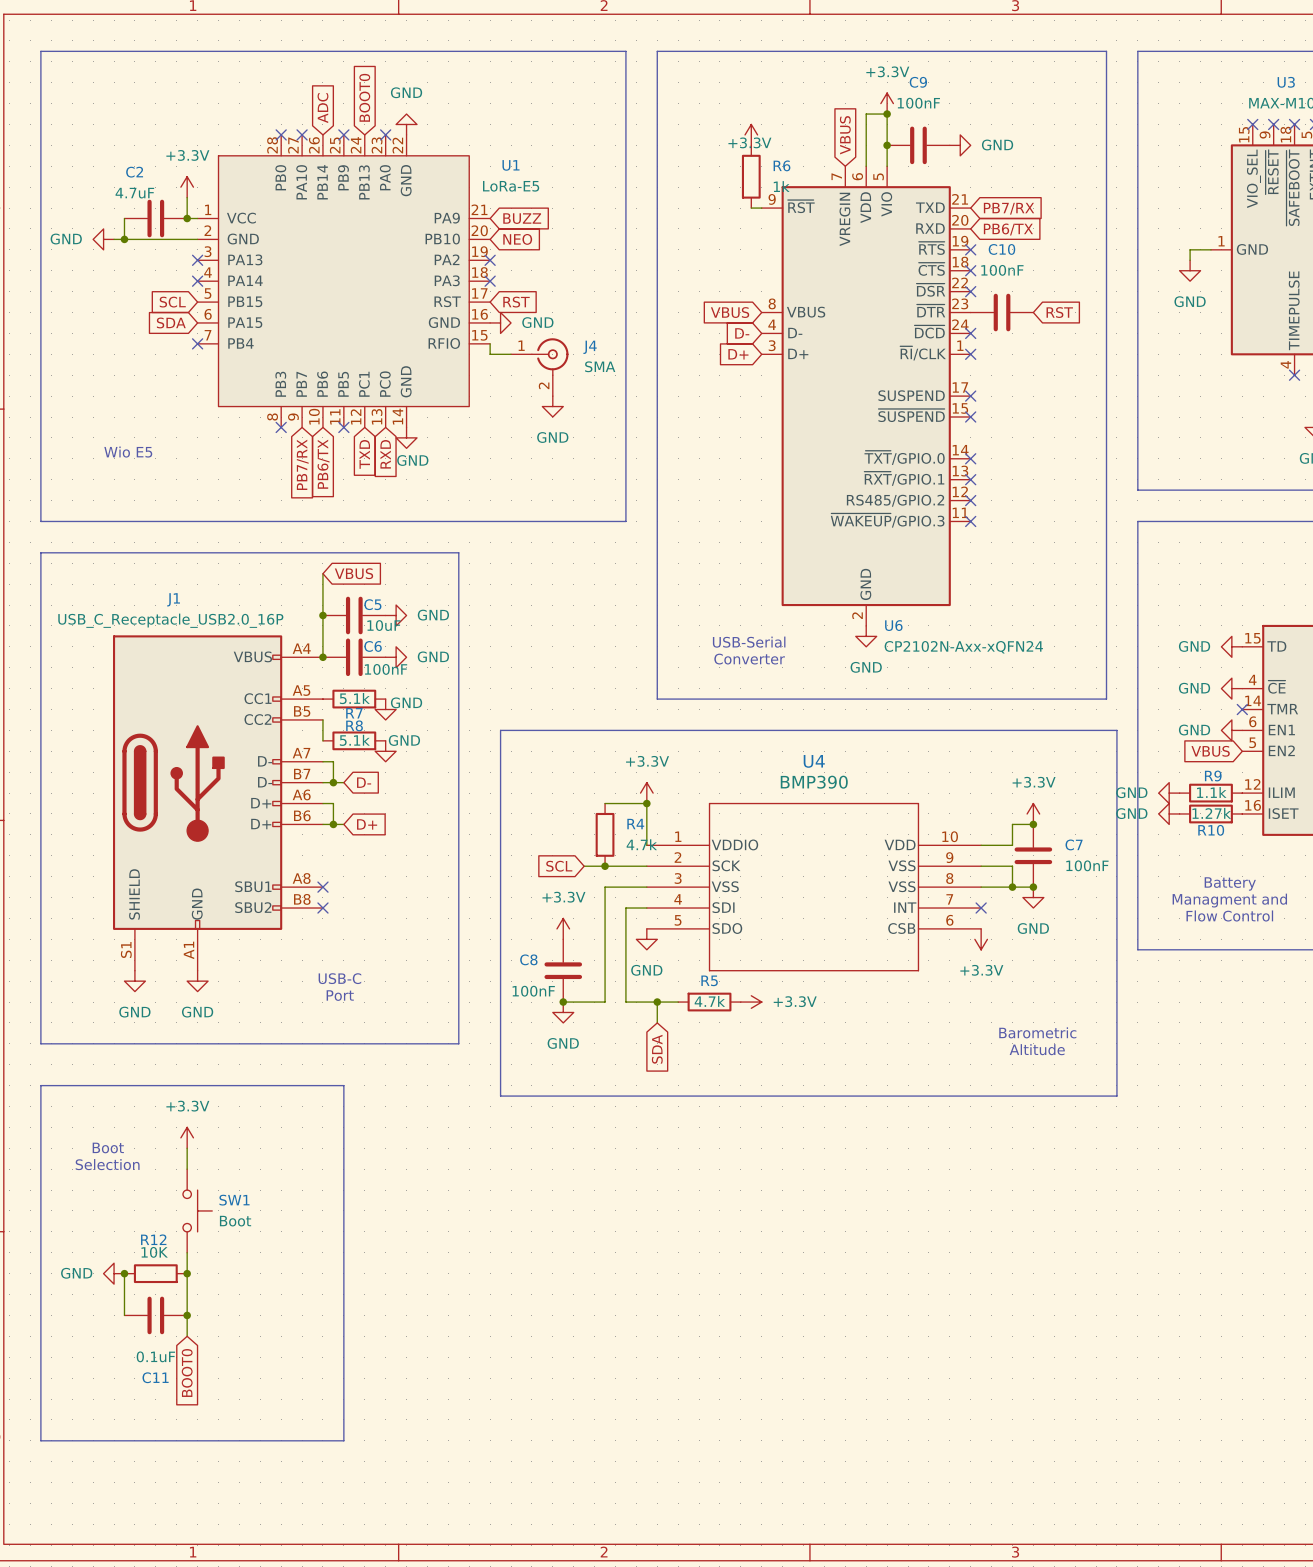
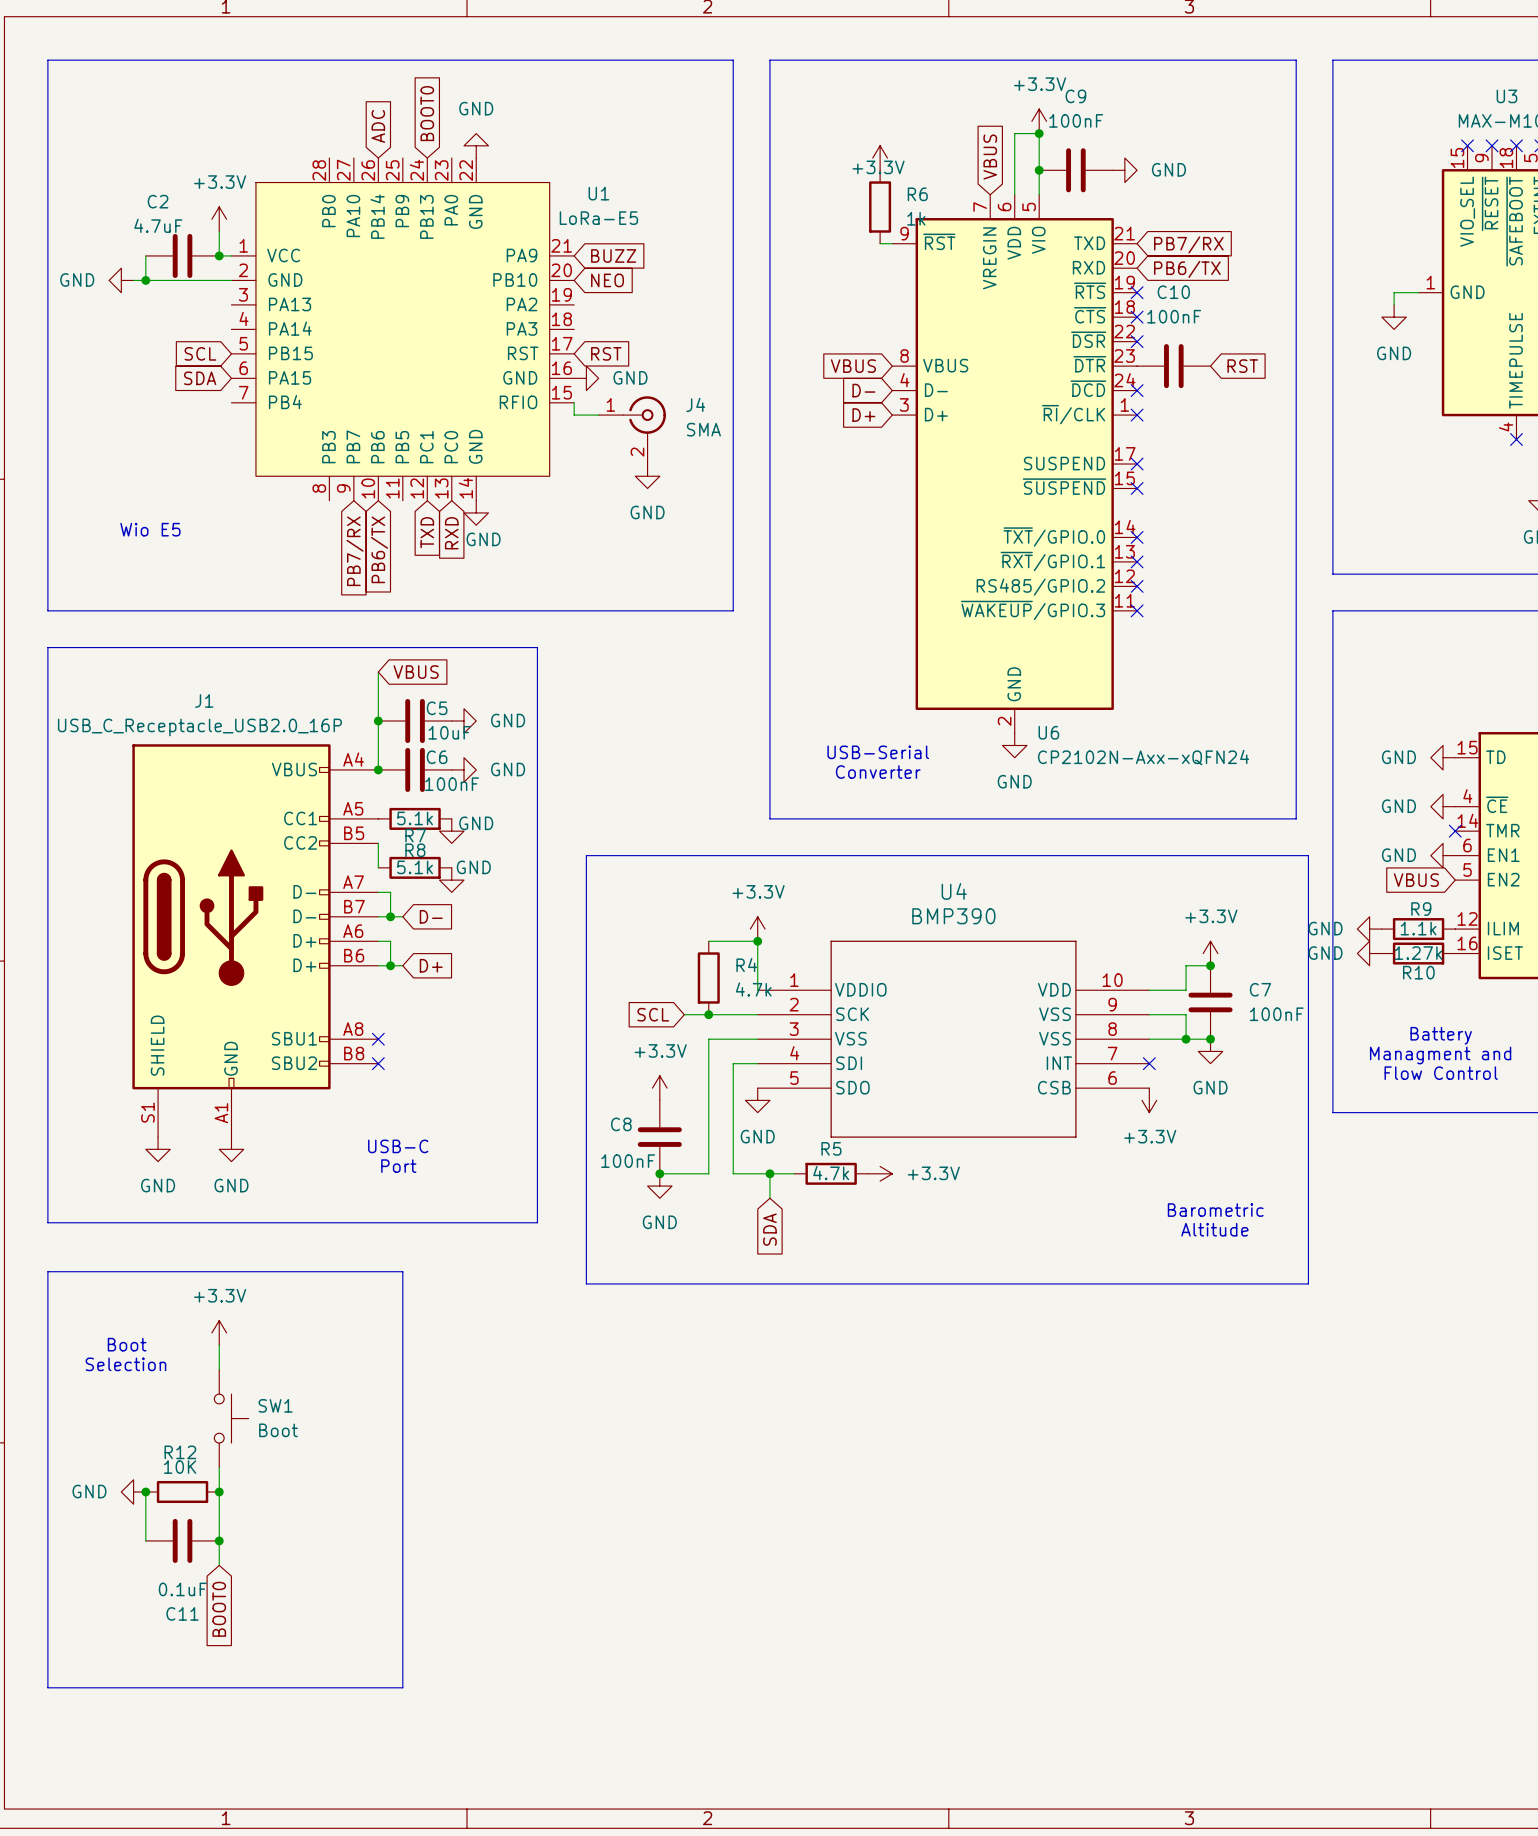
no-connect mark: (281, 134) -> none
no-connect mark: (302, 134) -> none
no-connect mark: (343, 134) -> none
no-connect mark: (385, 134) -> none
no-connect mark: (197, 260) -> none
no-connect mark: (490, 260) -> none
no-connect mark: (197, 281) -> none
no-connect mark: (490, 281) -> none
no-connect mark: (197, 343) -> none
no-connect mark: (281, 427) -> none
no-connect mark: (343, 427) -> none

